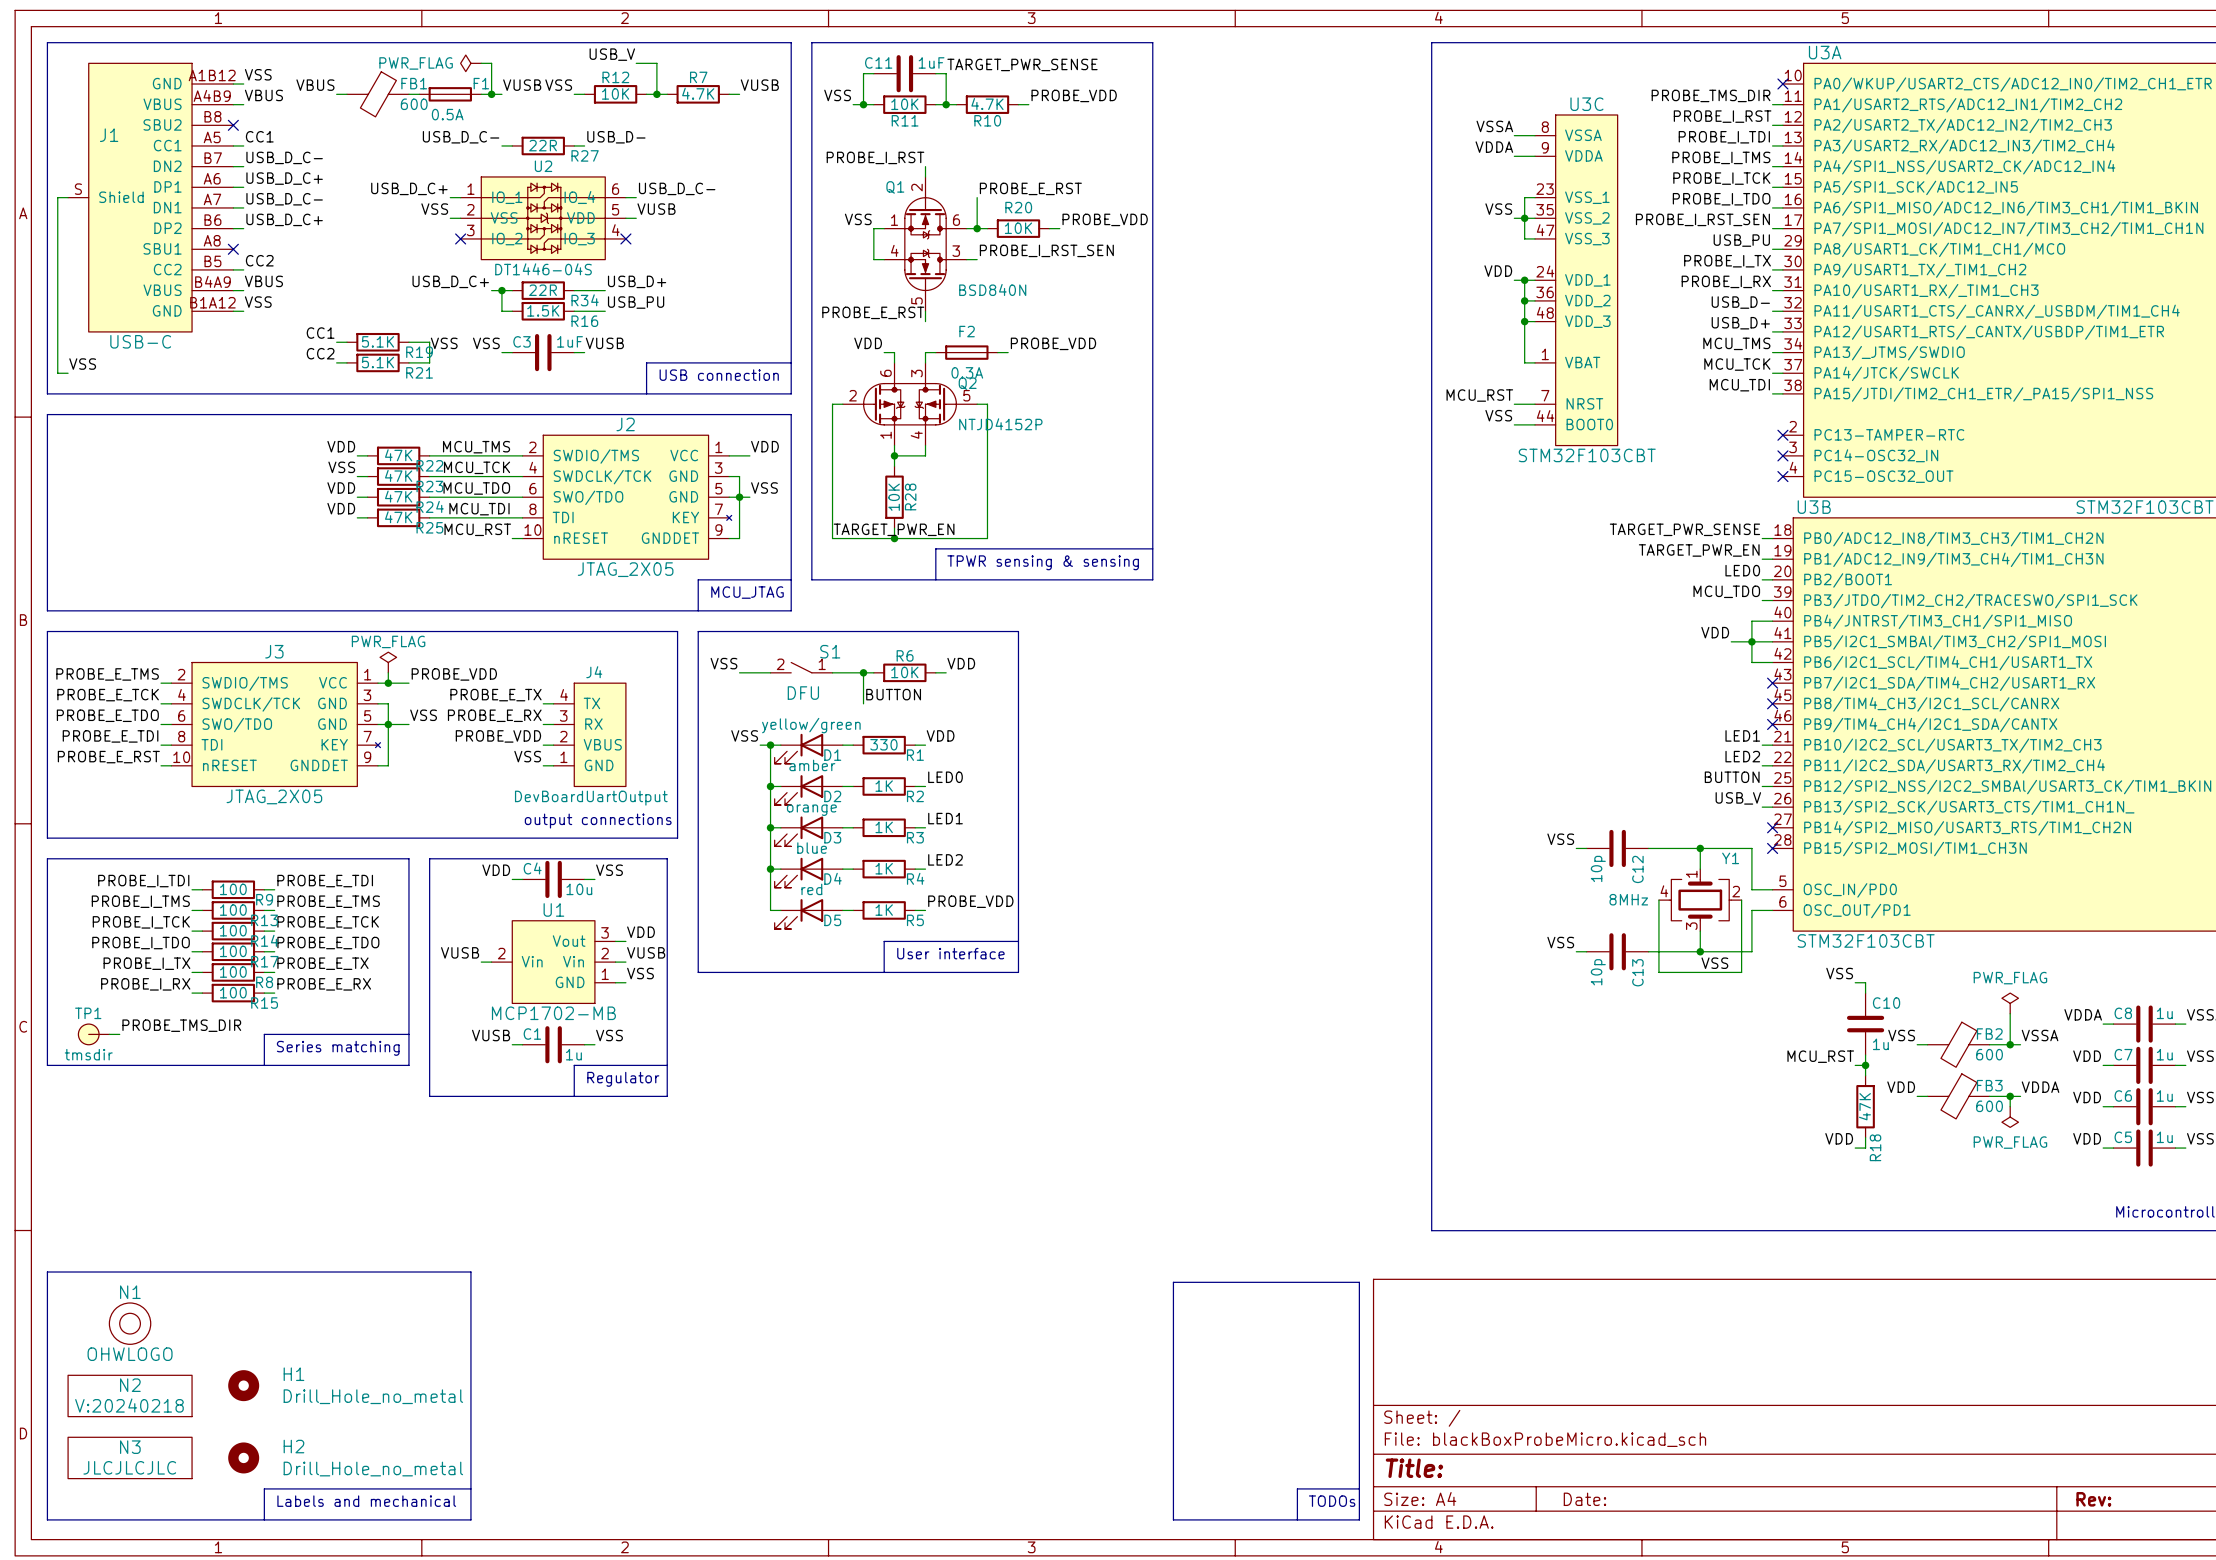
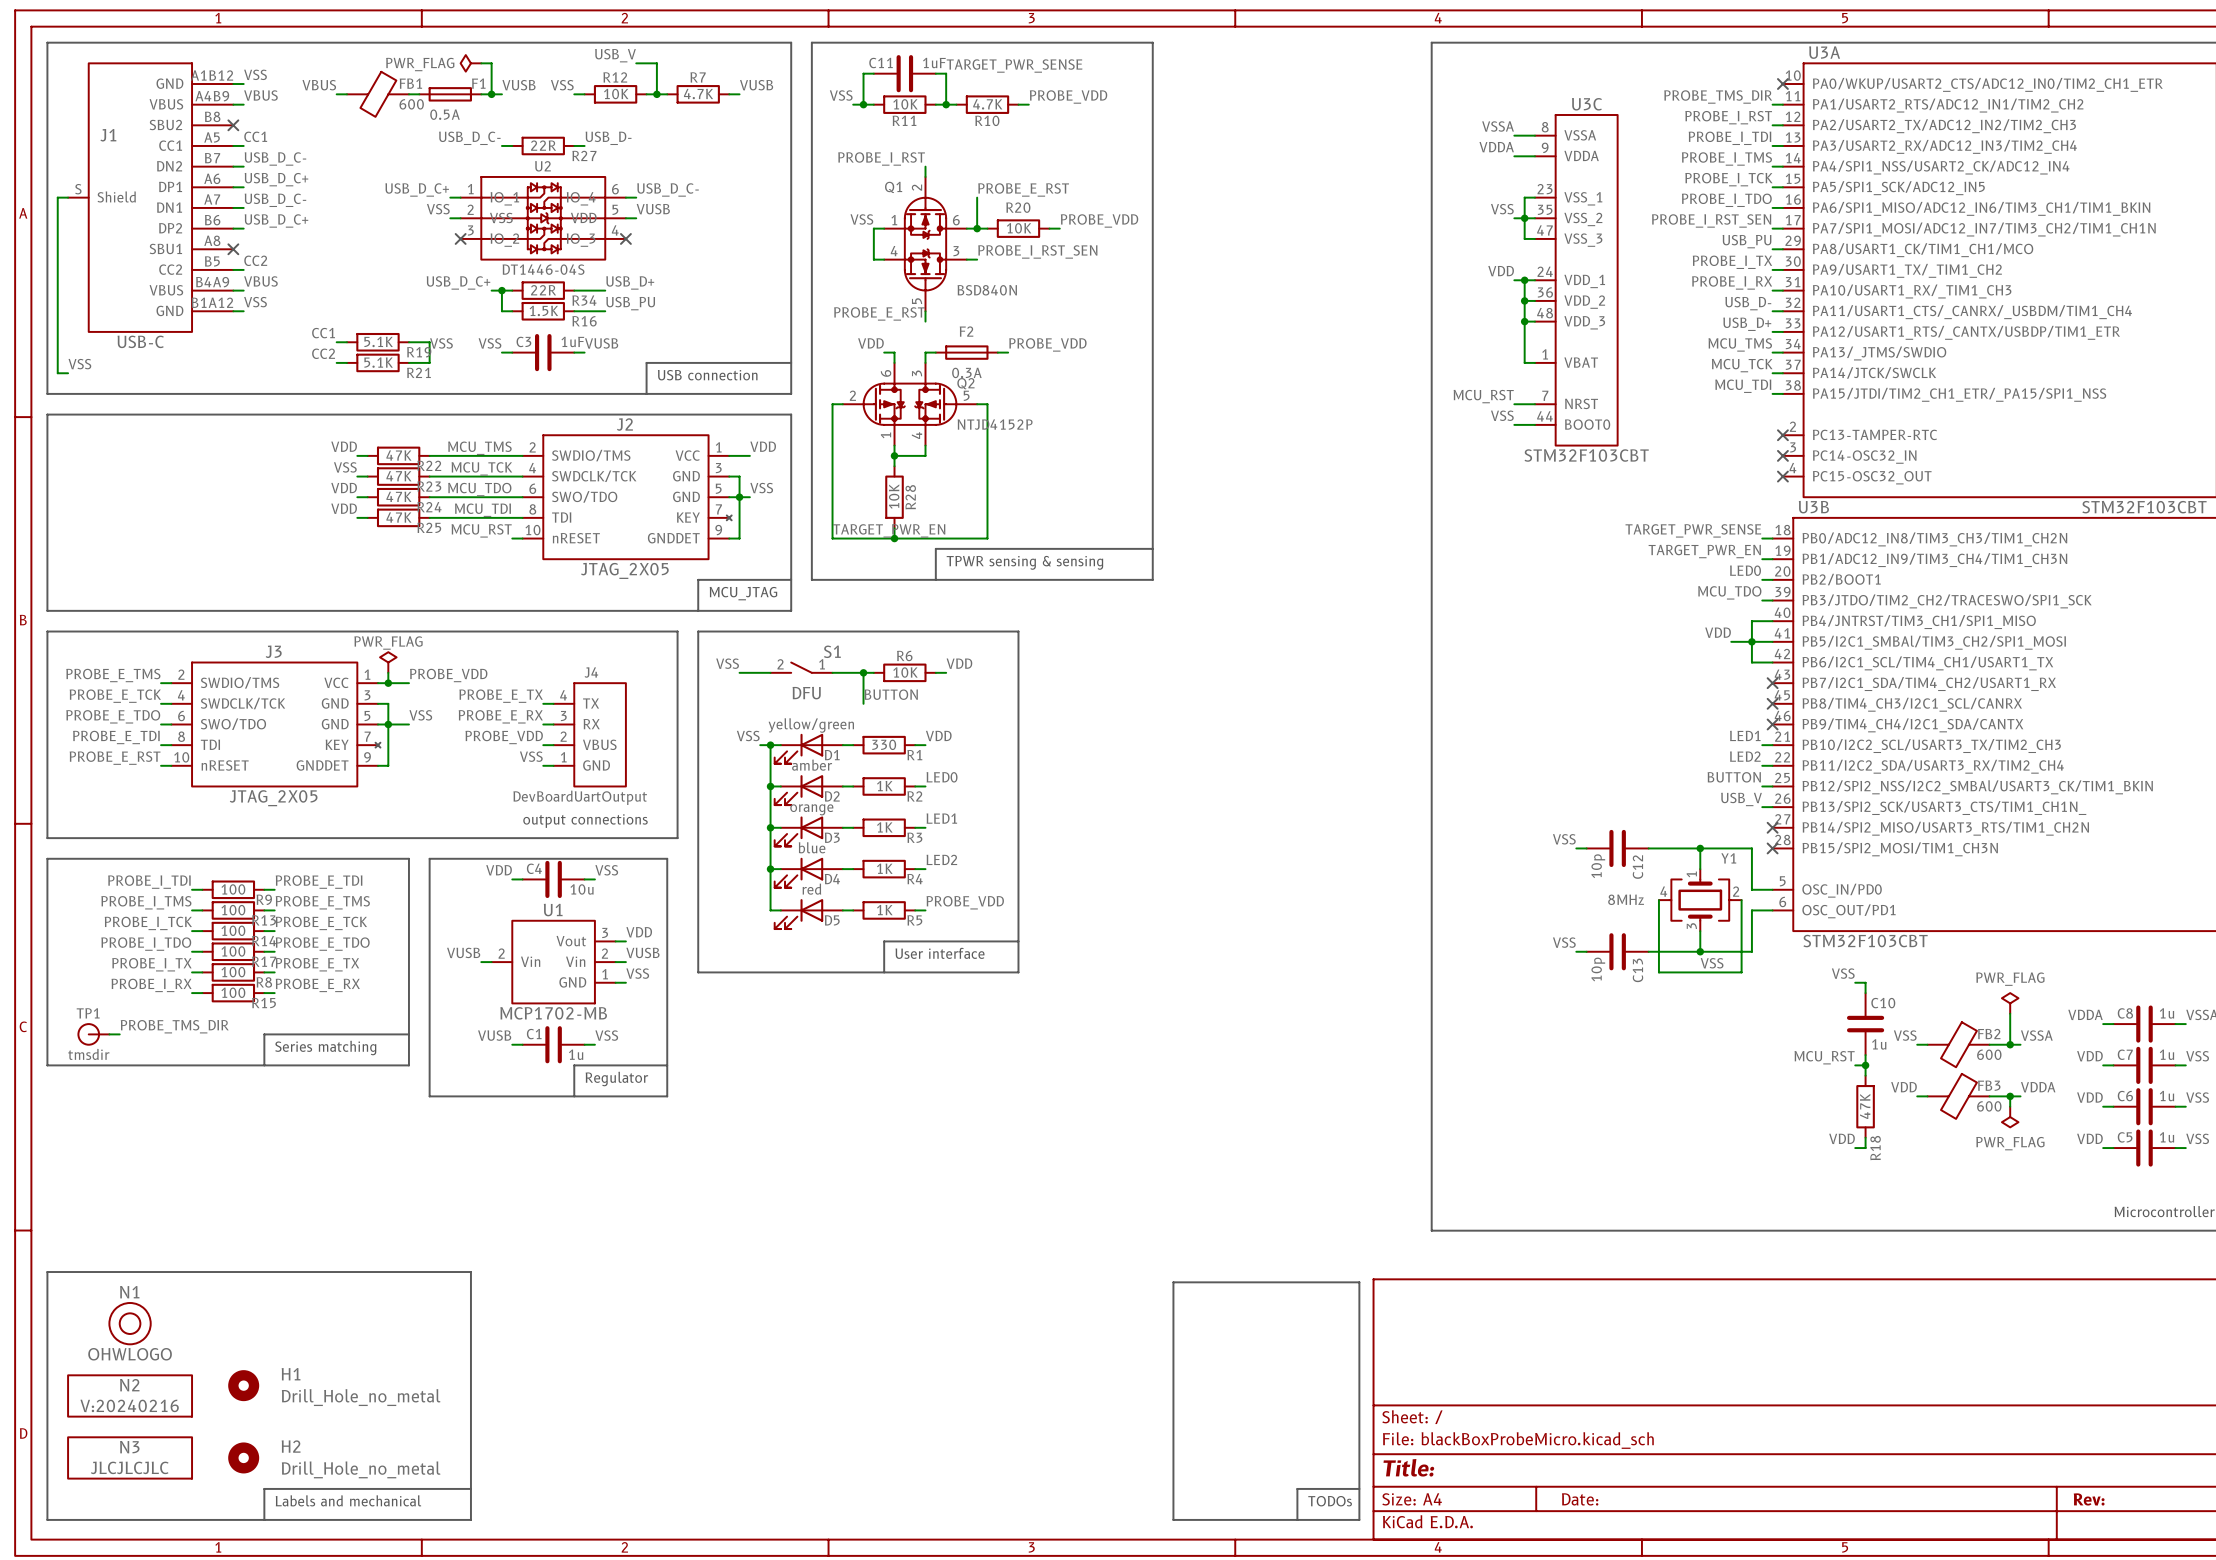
N2 value: V:20240218 (129, 1405) -> V:20240216 (129, 1405)

